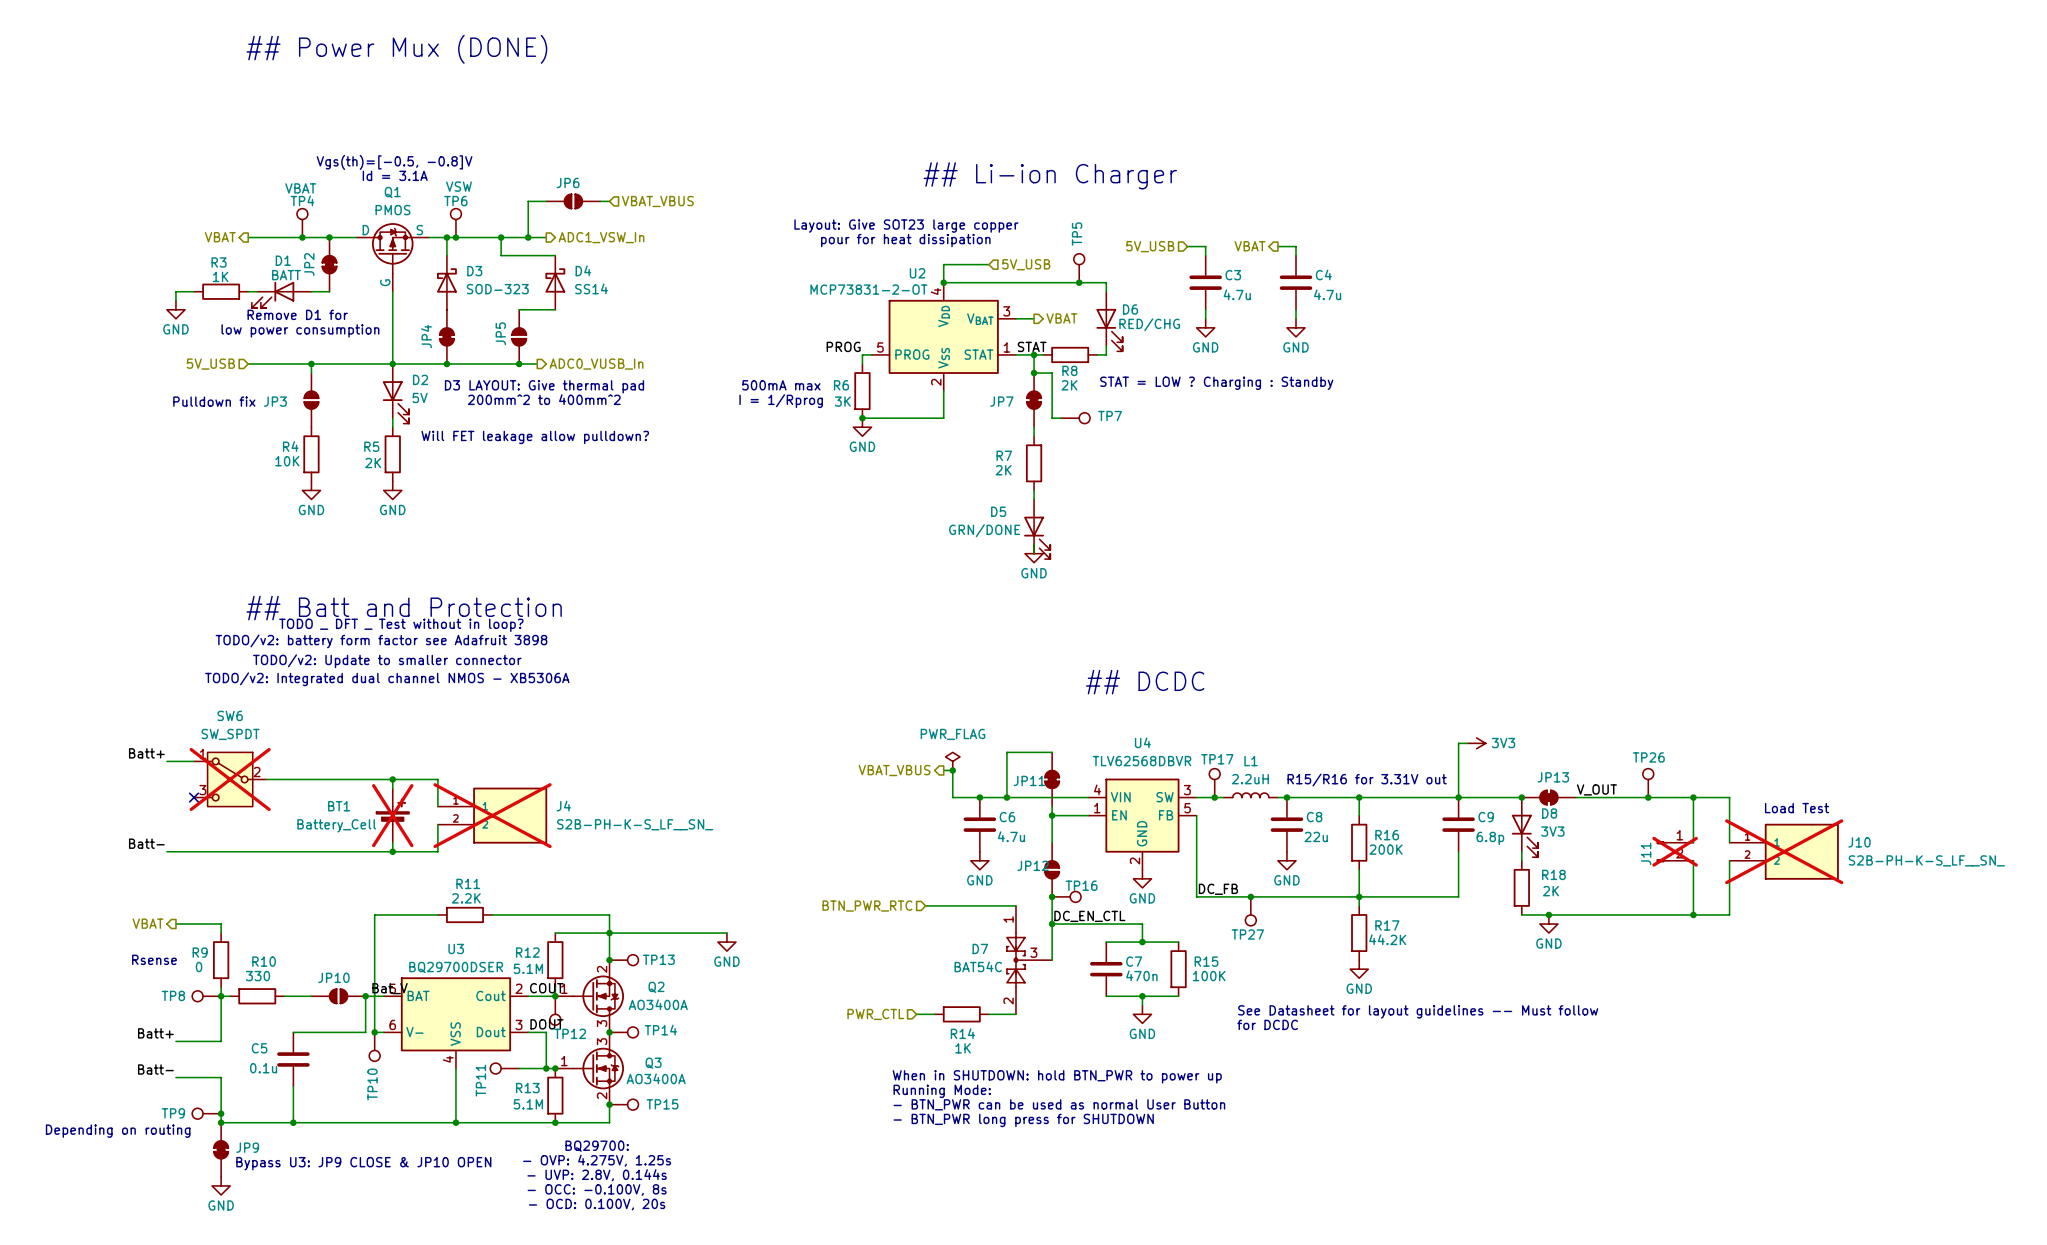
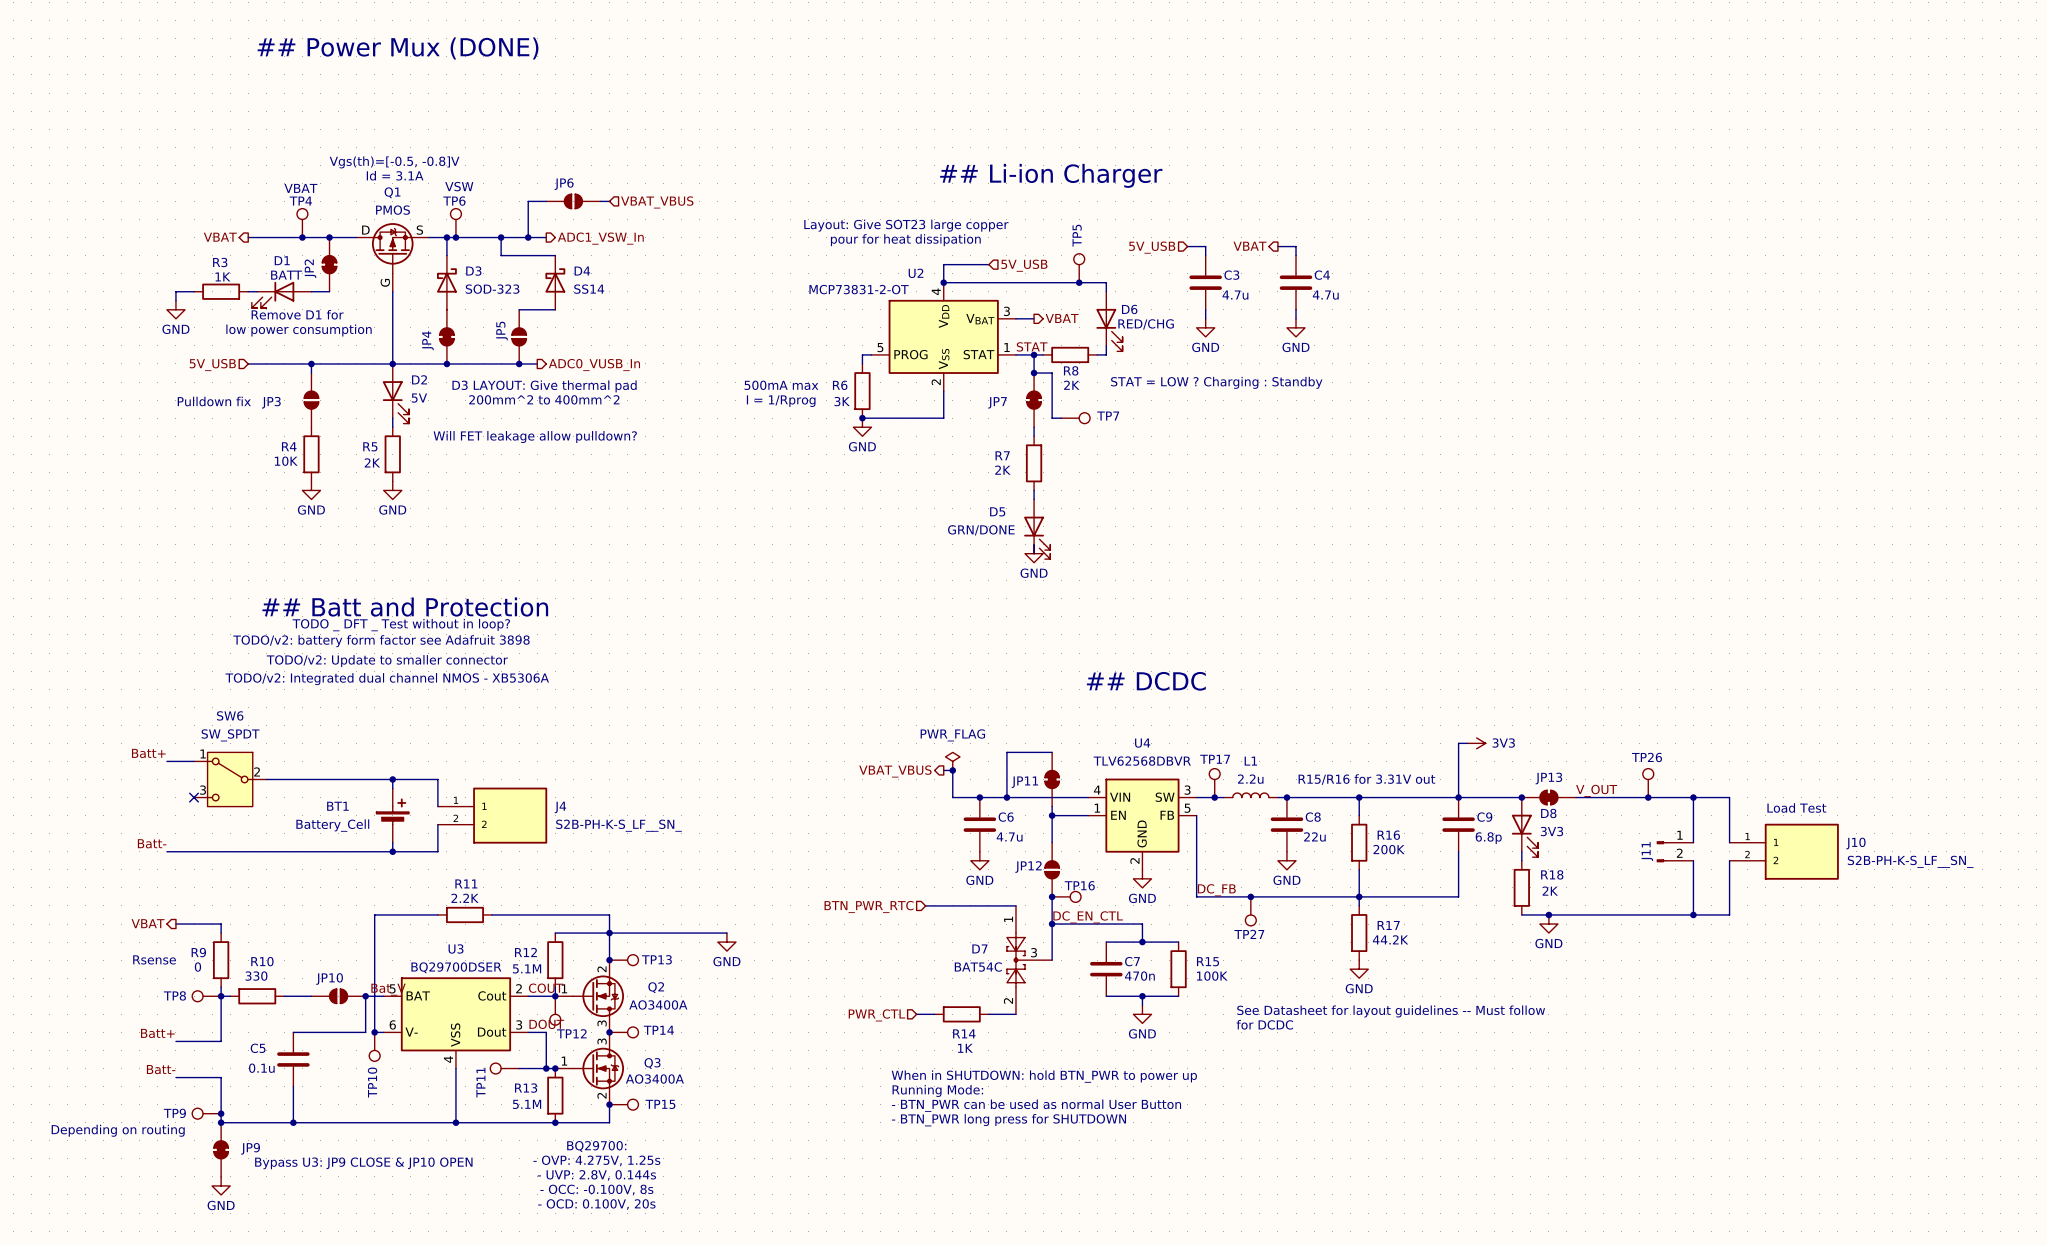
label: PROG (843, 346) -> none
SW6 do-not-place cross: (230, 779) -> none
L1 value: 2.2uH (1250, 779) -> 2.2u (1250, 779)
BT1 do-not-place cross: (392, 815) -> none
J4 do-not-place cross: (492, 815) -> none
J11 do-not-place cross: (1675, 851) -> none
J10 do-not-place cross: (1784, 851) -> none

